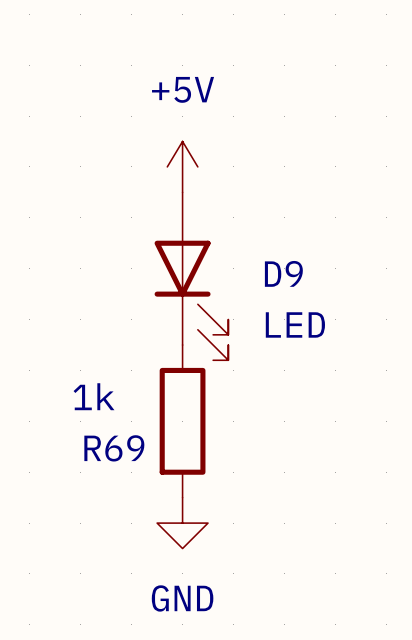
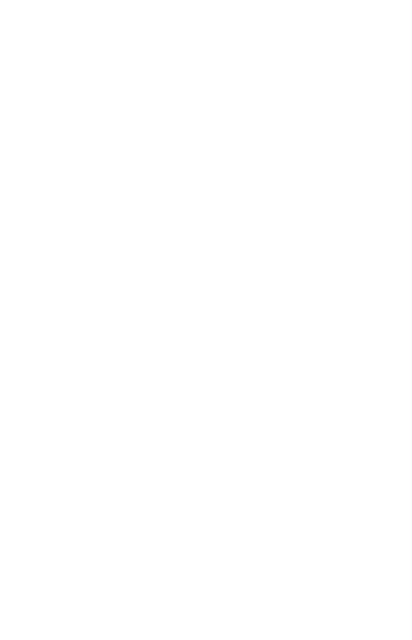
power symbol: +5V (182, 166) -> none
D9: LED (191, 276) -> none
R69: 1k (182, 421) -> none
power symbol: GND (182, 523) -> none

